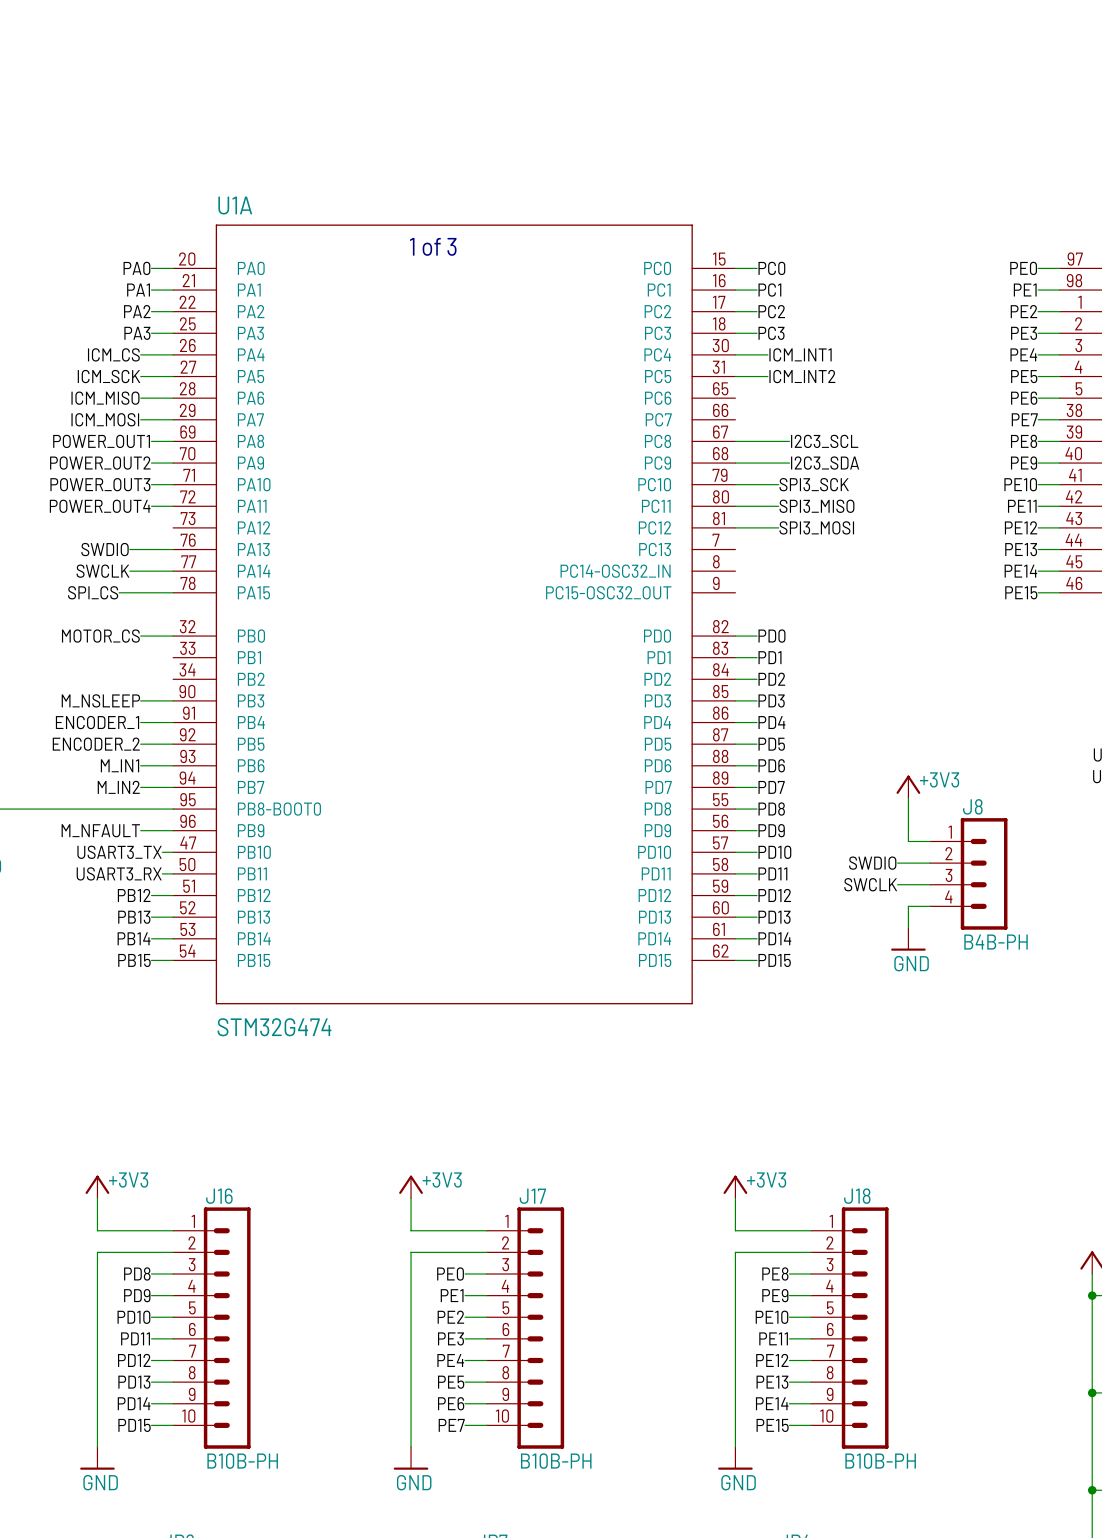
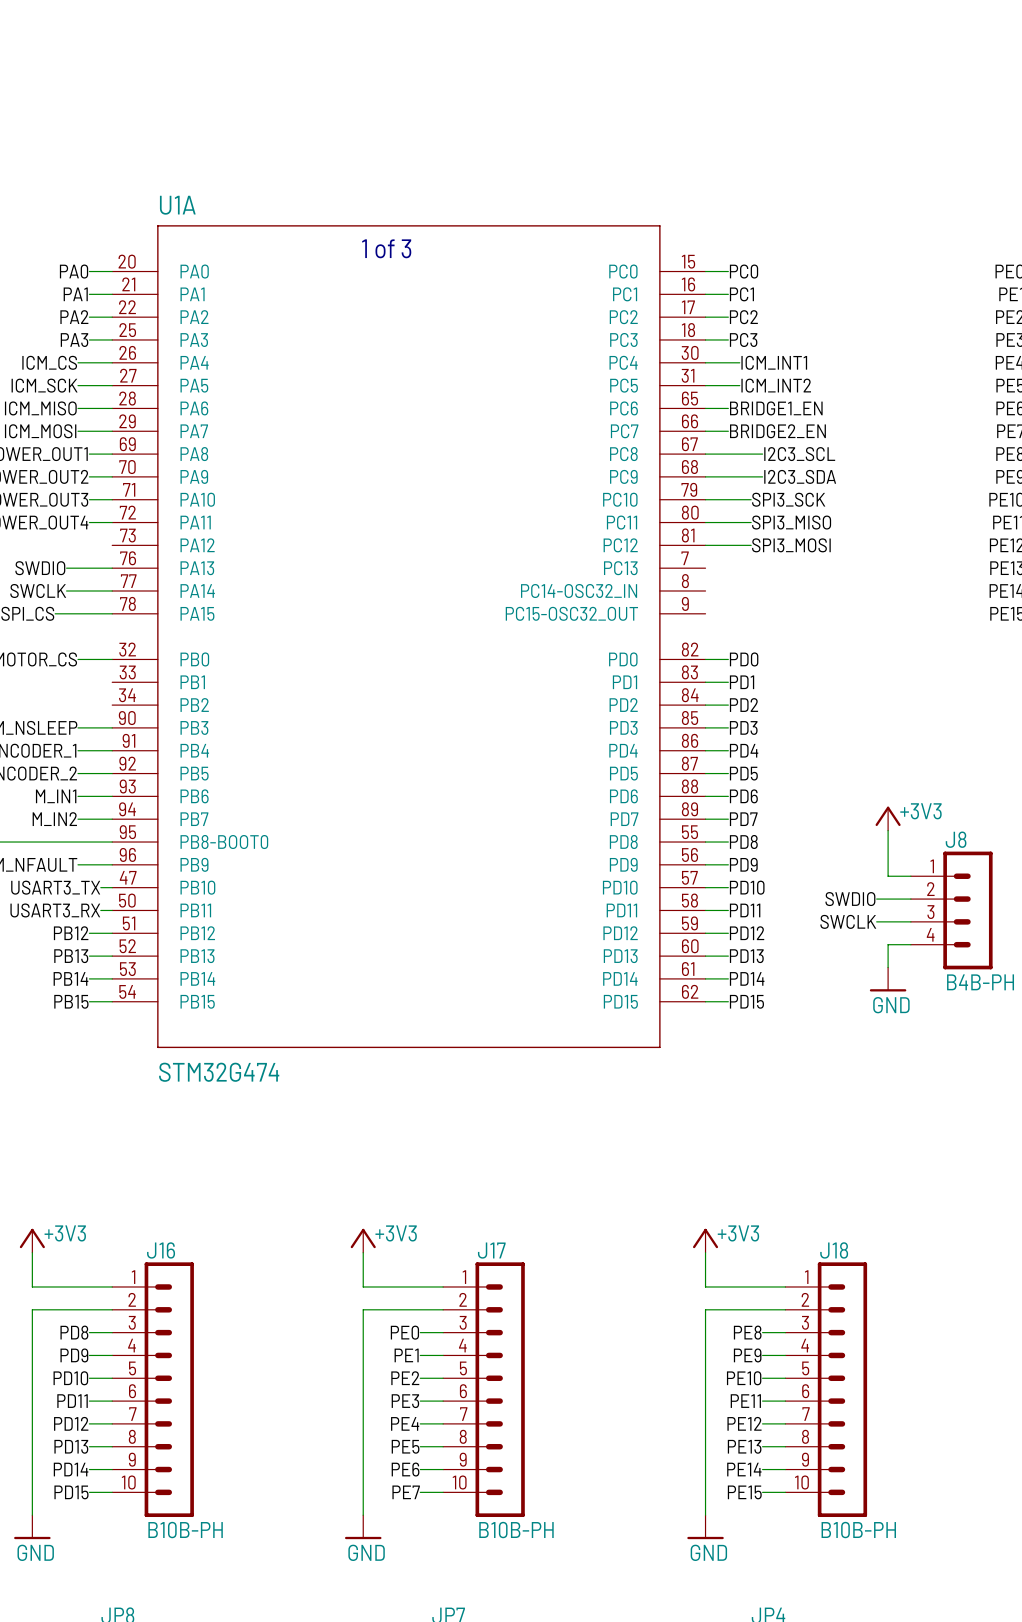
wire: none -> (705, 408) (728, 408)
label: none -> BRIDGE1_EN (776, 408)
wire: none -> (705, 431) (728, 431)
label: none -> BRIDGE2_EN (777, 431)

